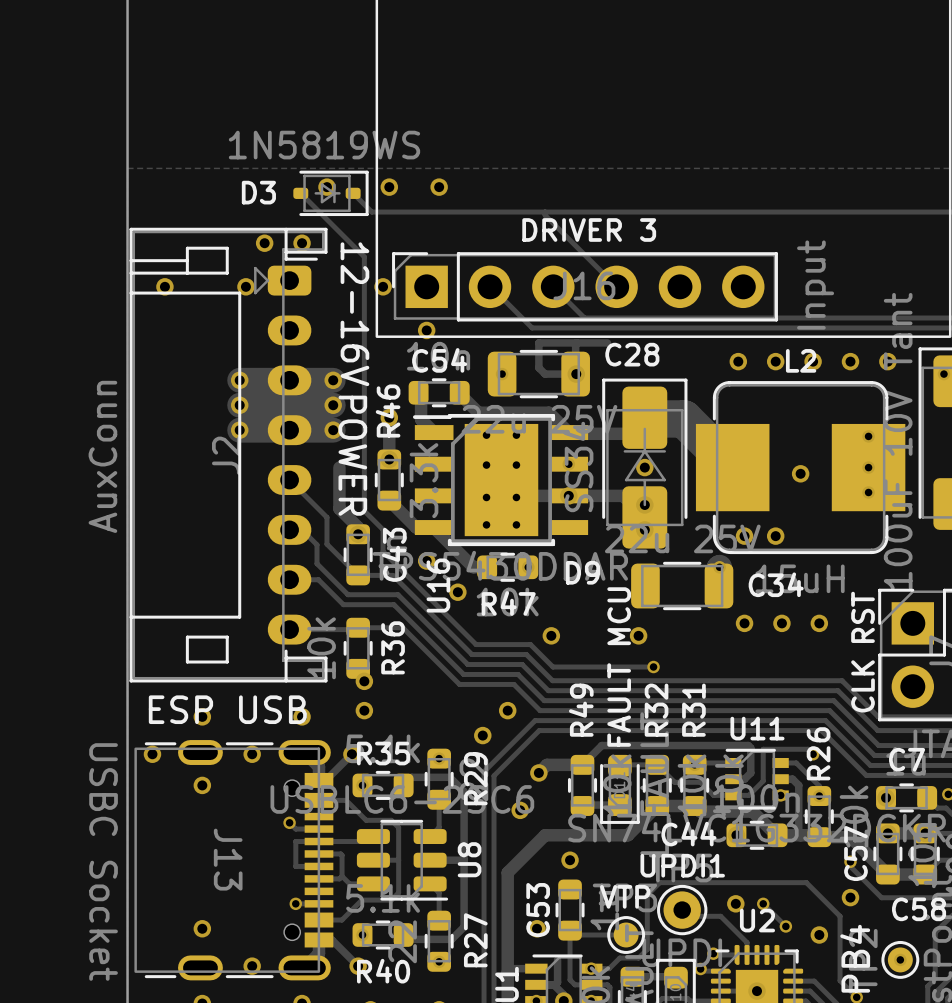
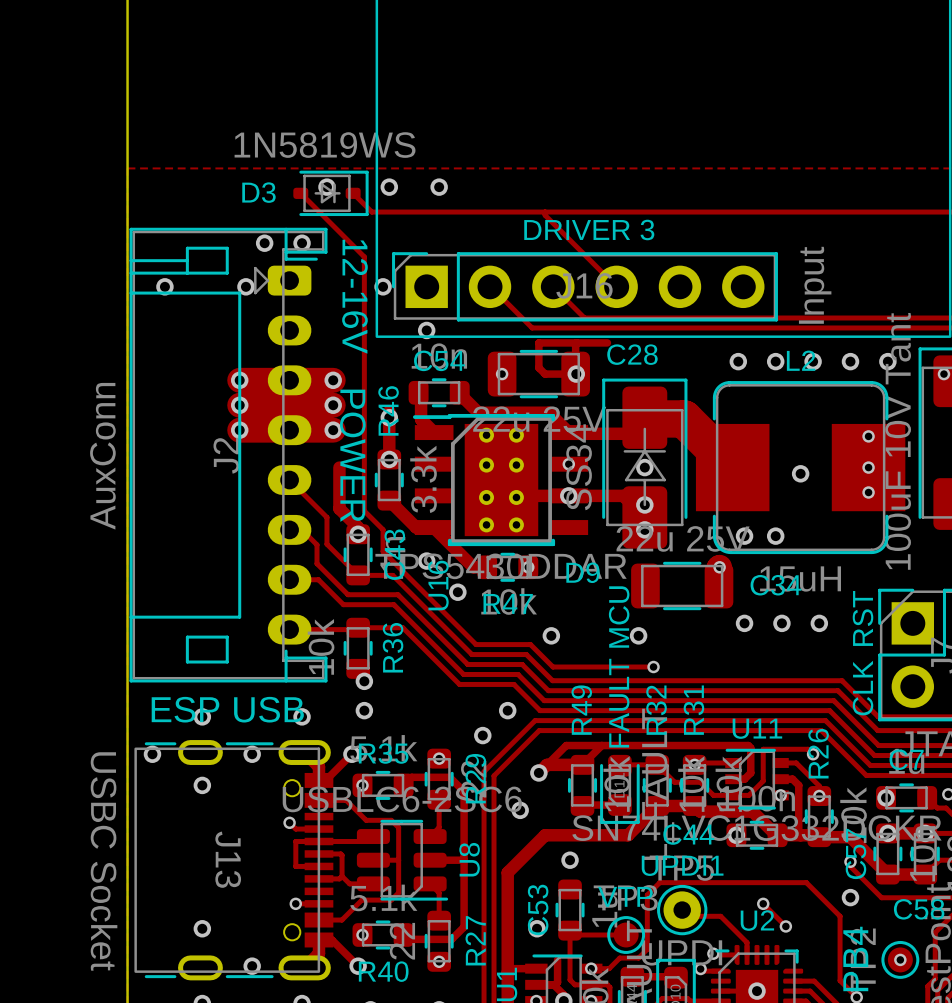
track: none -> (601, 745) (566, 745) (538, 772)
via: (735, 903) -> none
via: (819, 934) -> none

